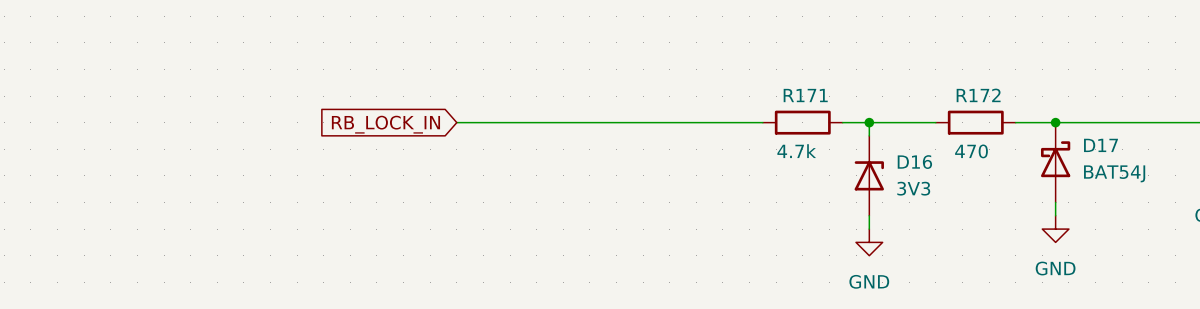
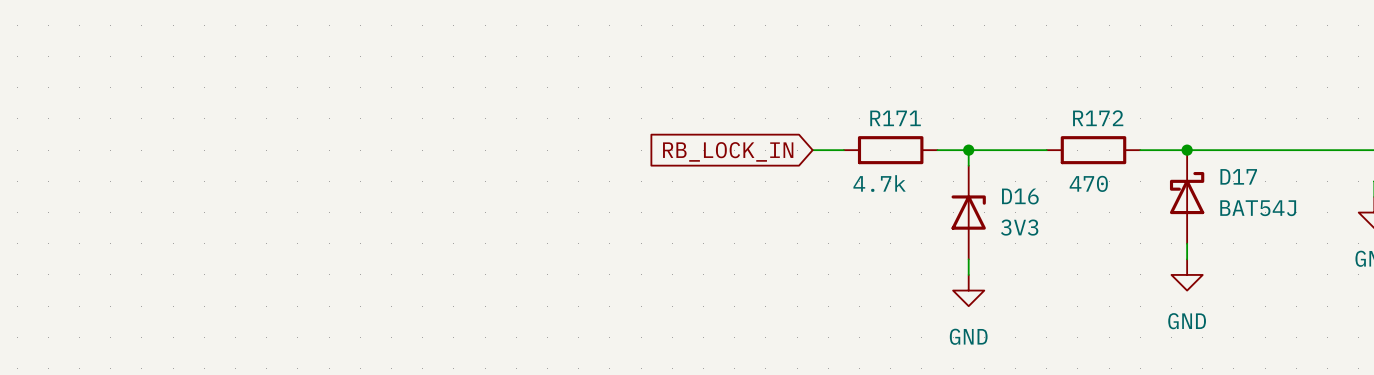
wire: (456, 122) (736, 122) -> none
global label: RB_LOCK_IN (385, 124) -> none
global label: none -> RB_LOCK_IN (728, 151)

